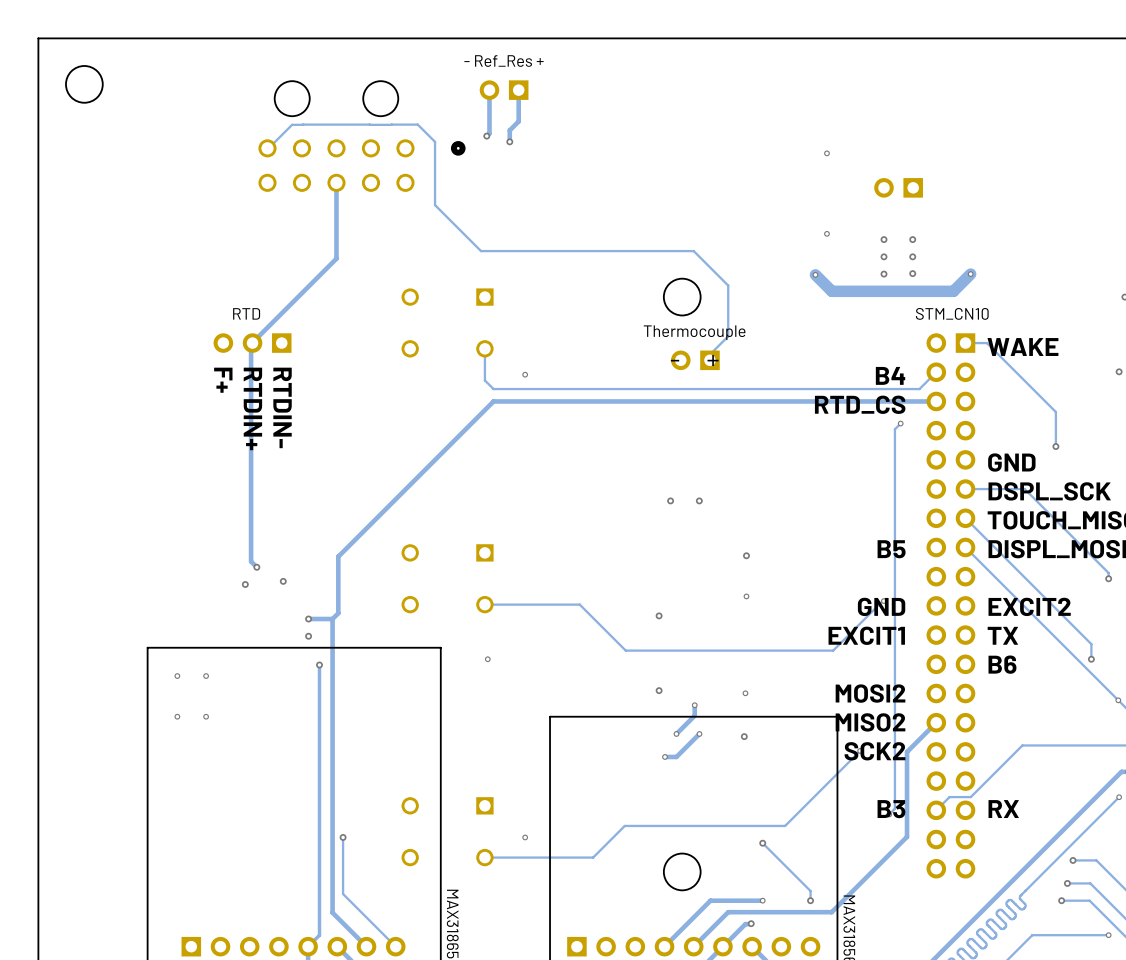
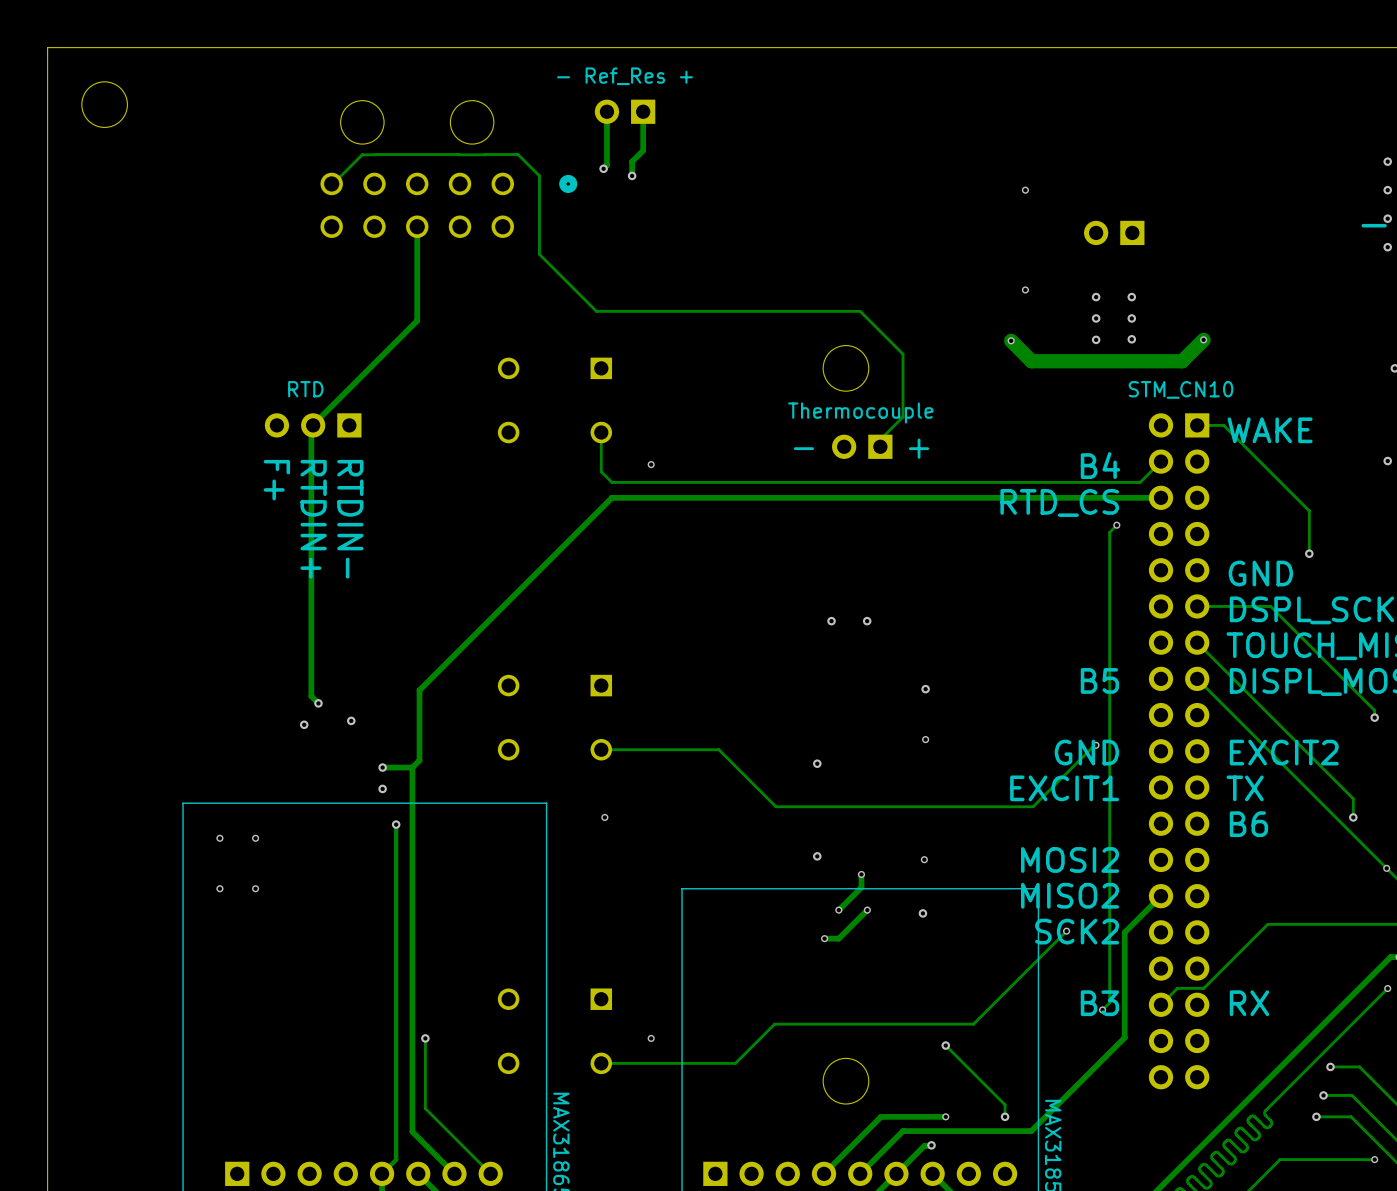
via: none -> (1387, 161)
via: none -> (1387, 190)
via: none -> (1387, 218)
via: none -> (1387, 247)

